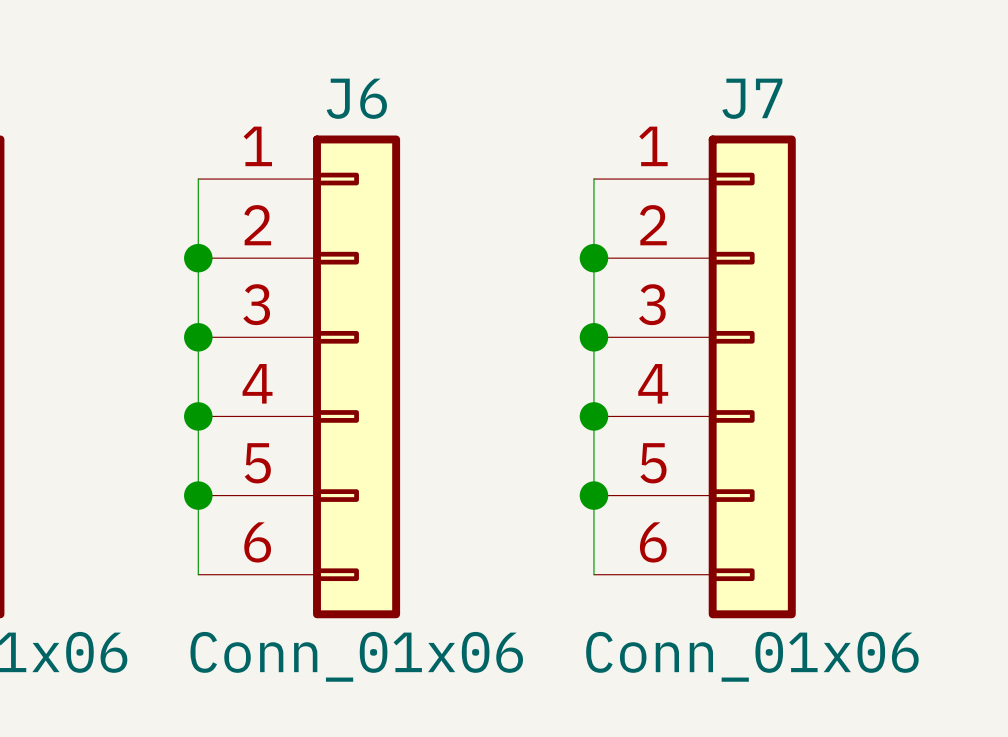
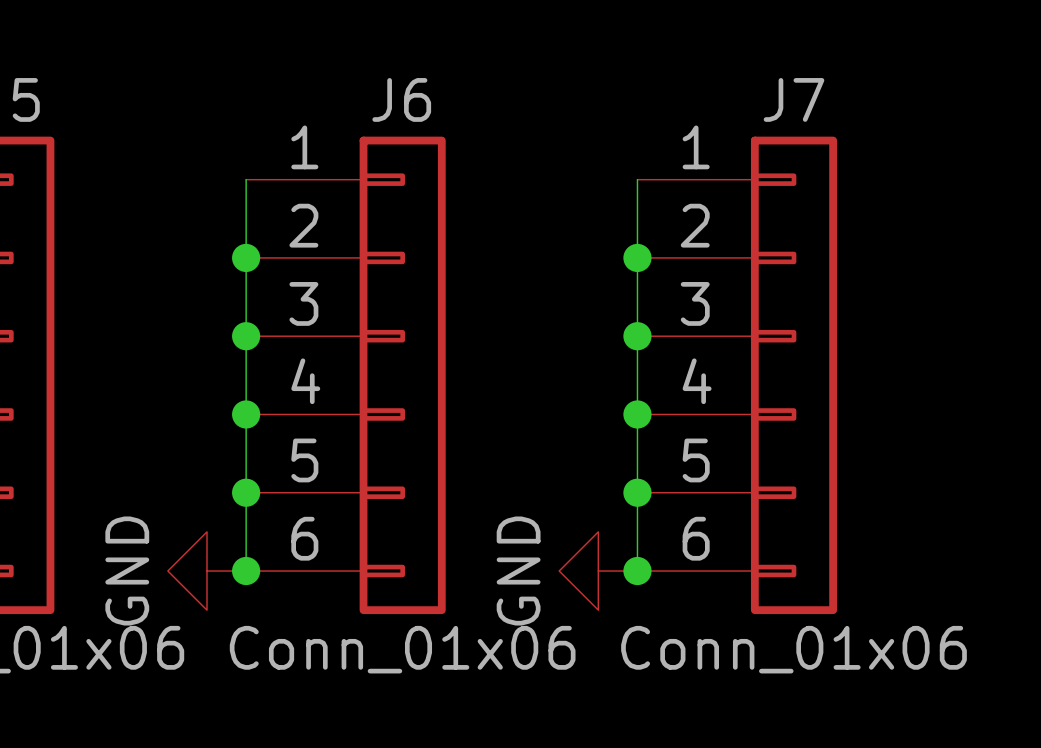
power symbol: none -> GND (207, 571)
junction: none -> (246, 571)
power symbol: none -> GND (598, 571)
junction: none -> (637, 571)

